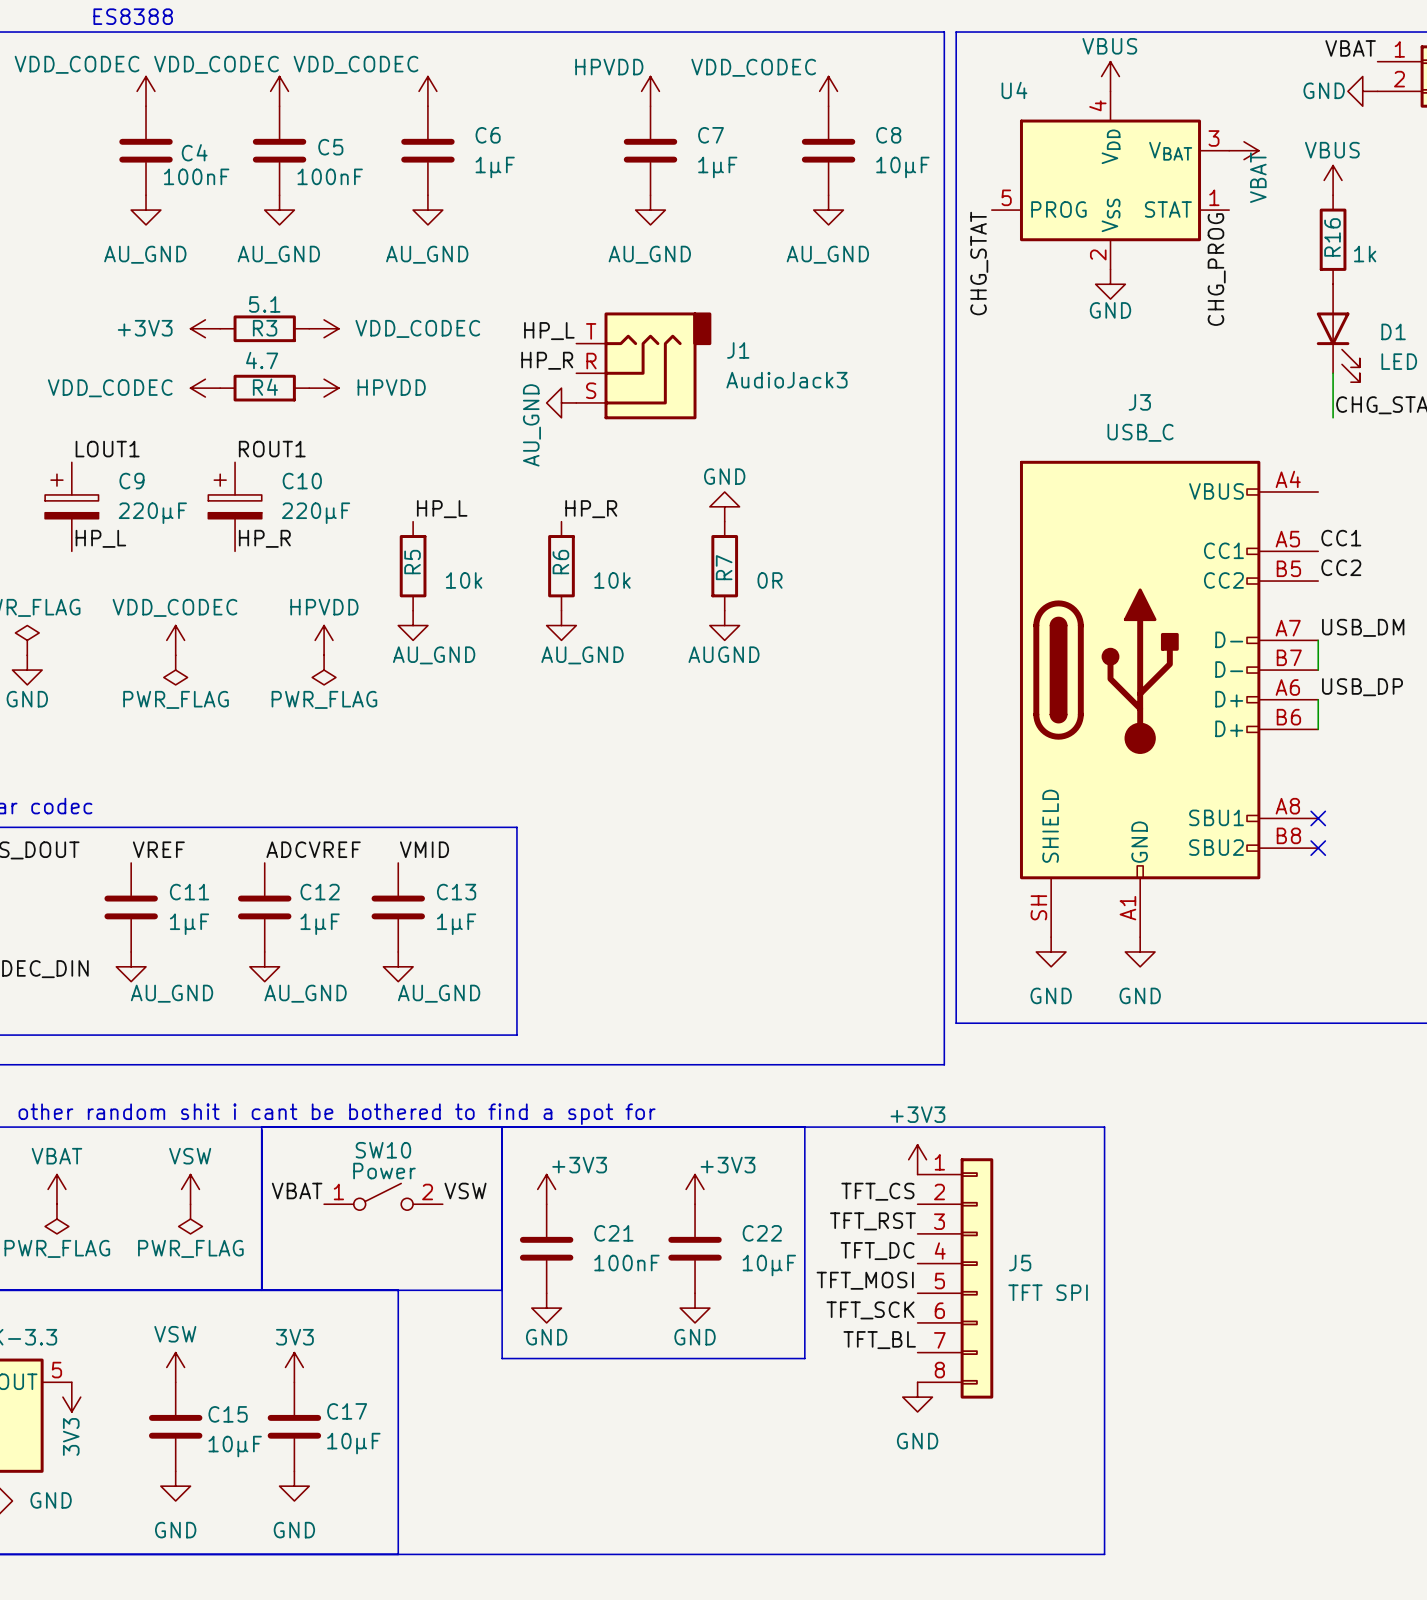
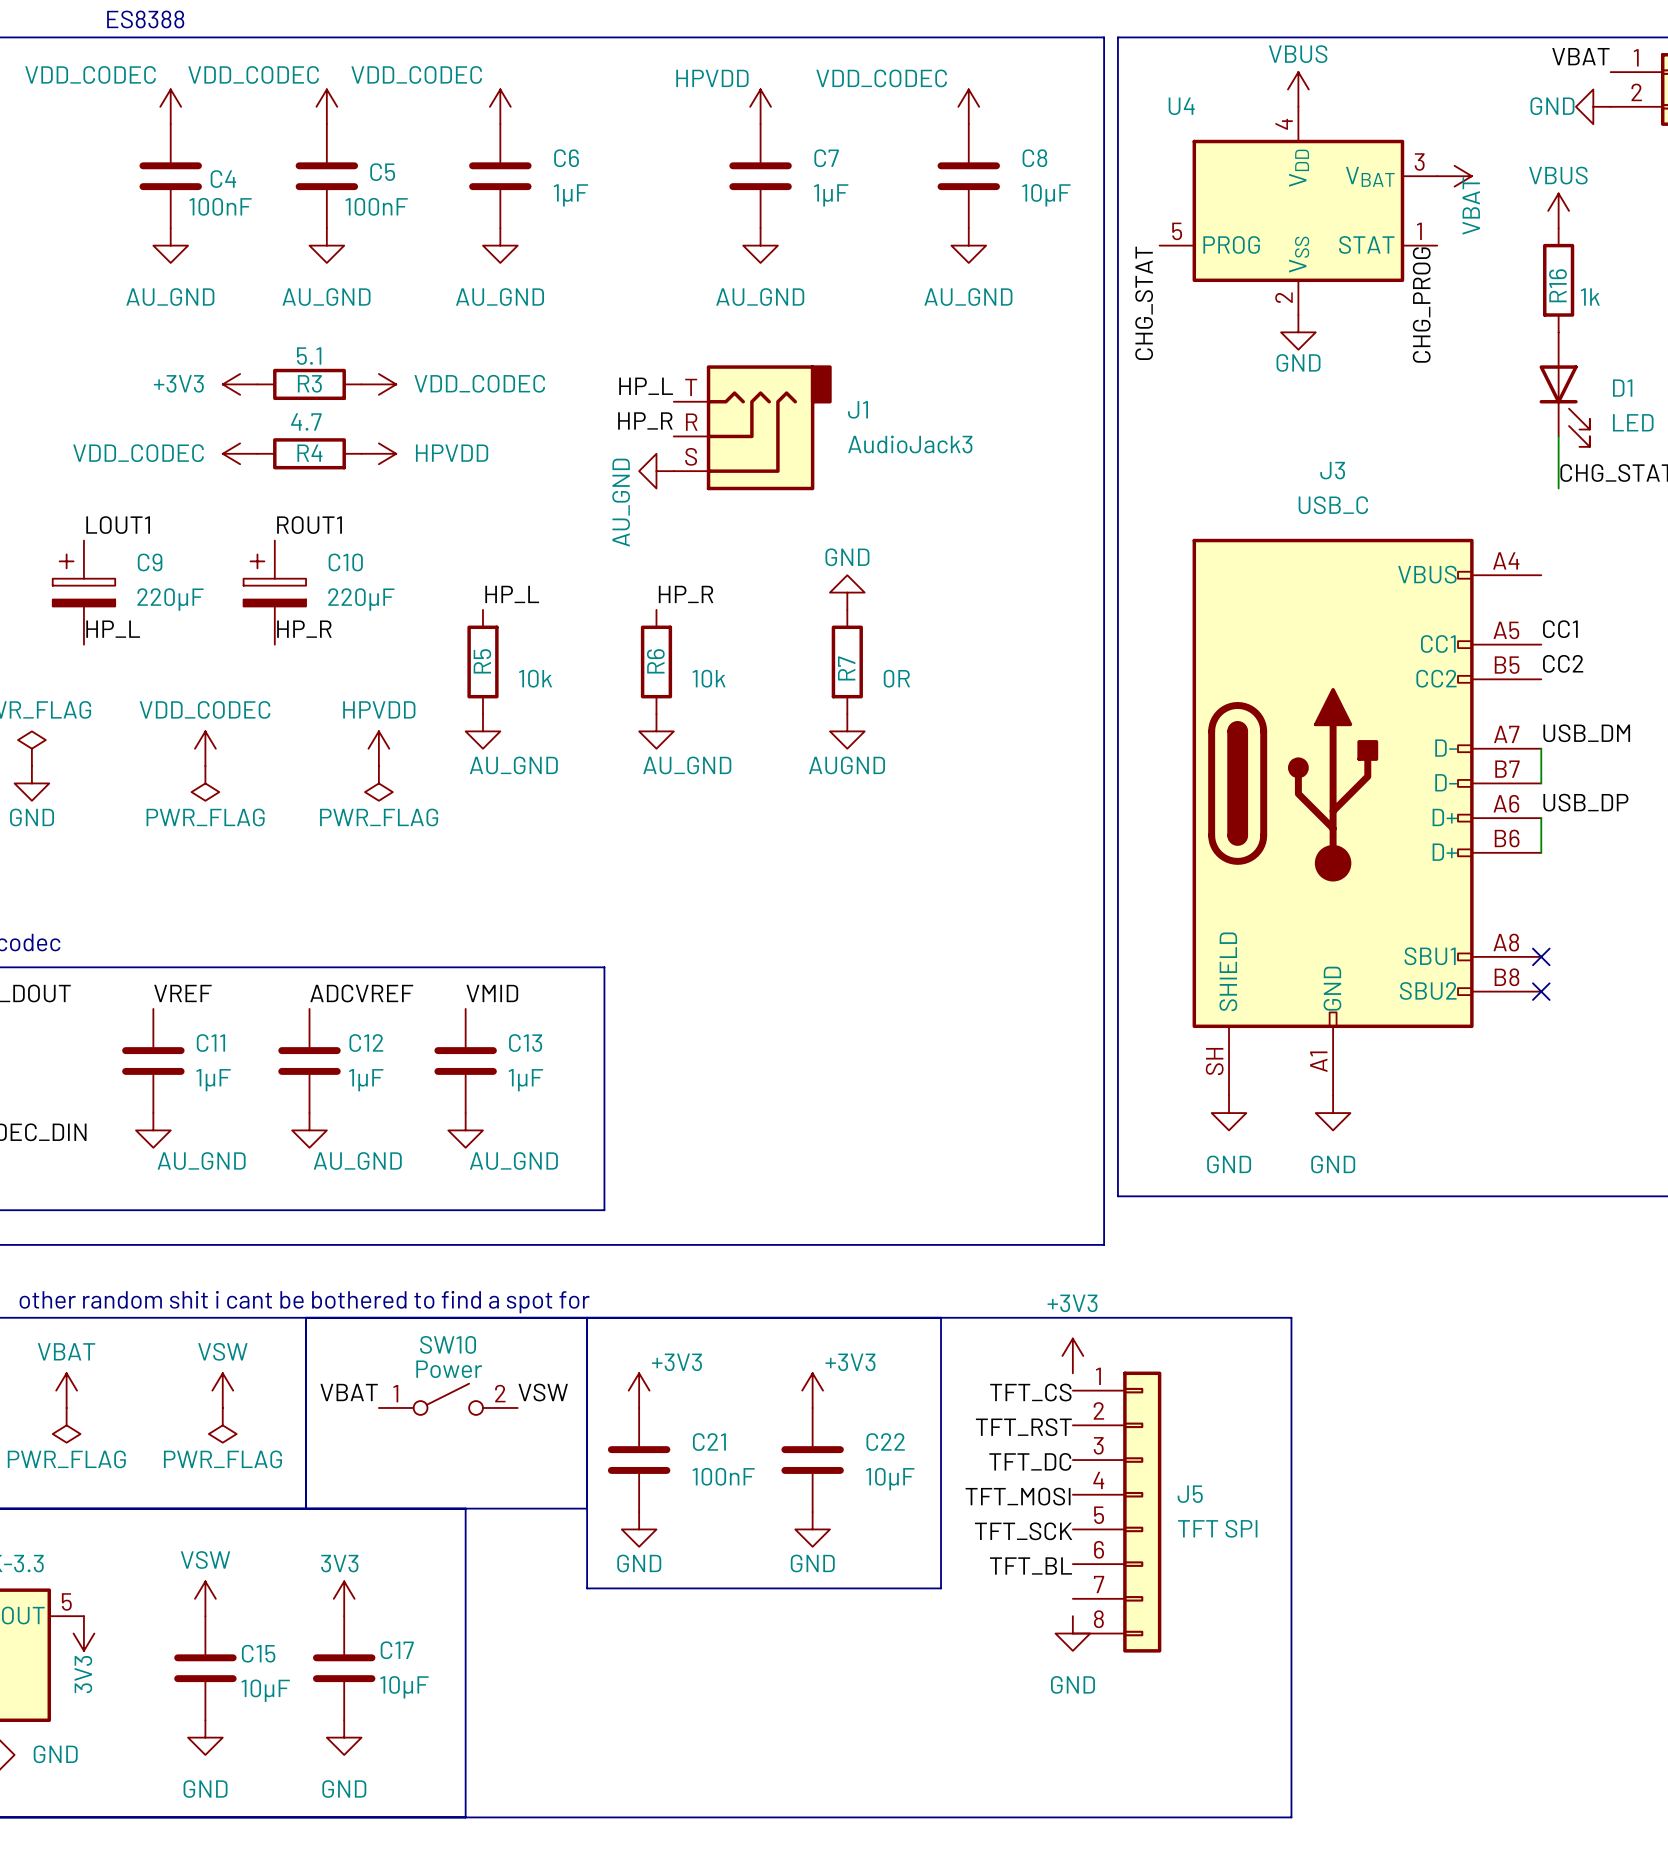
J5 position: (955, 1278) -> (1117, 1512)

